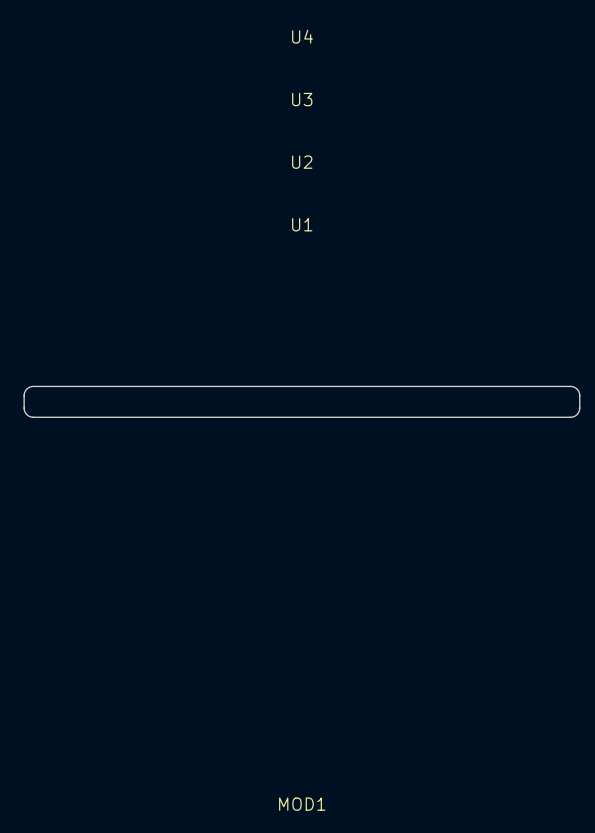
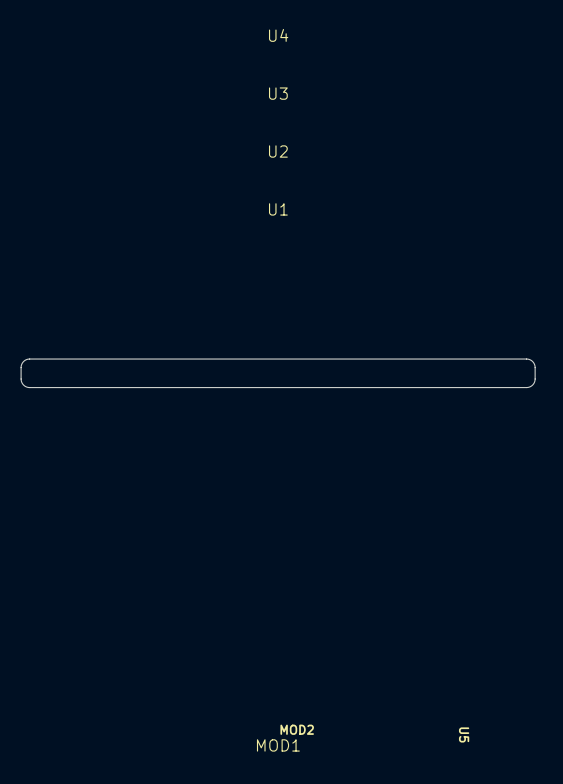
MOD2: none -> (297, 729)
U5: none -> (464, 734)

